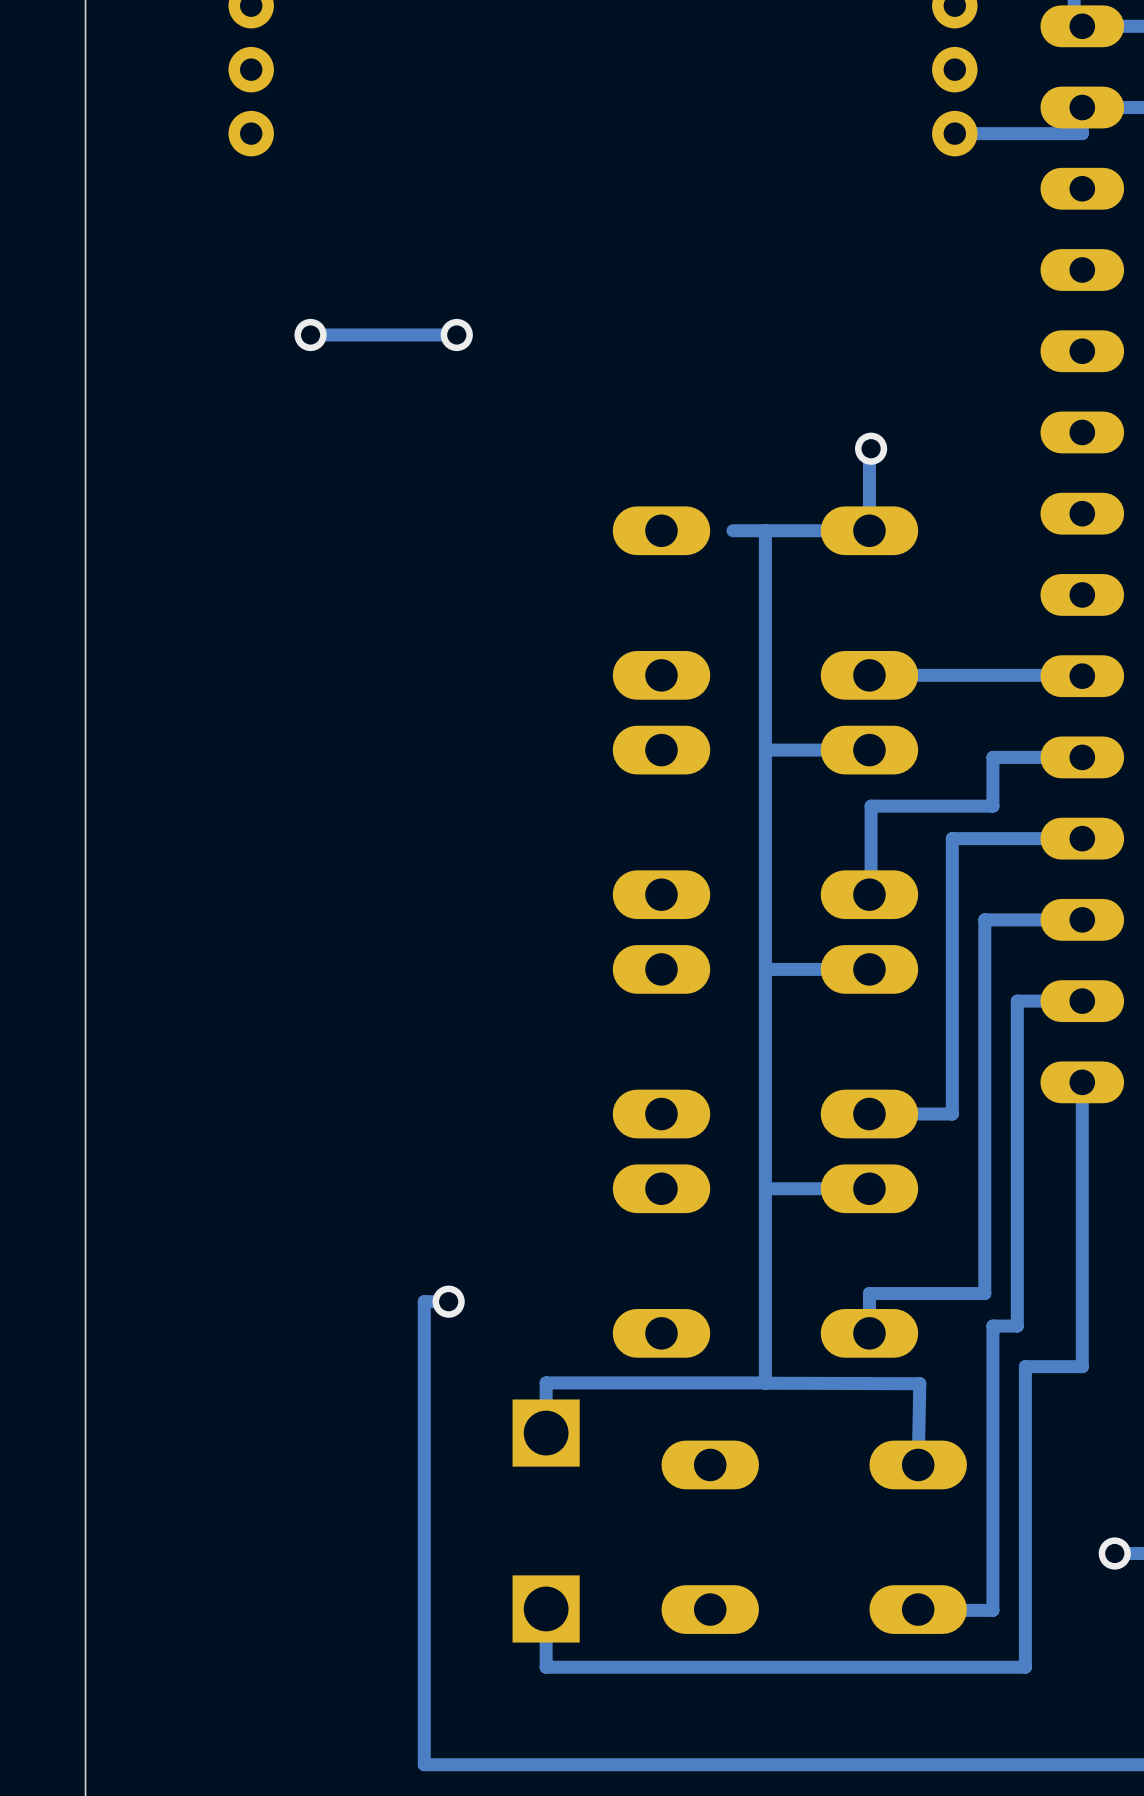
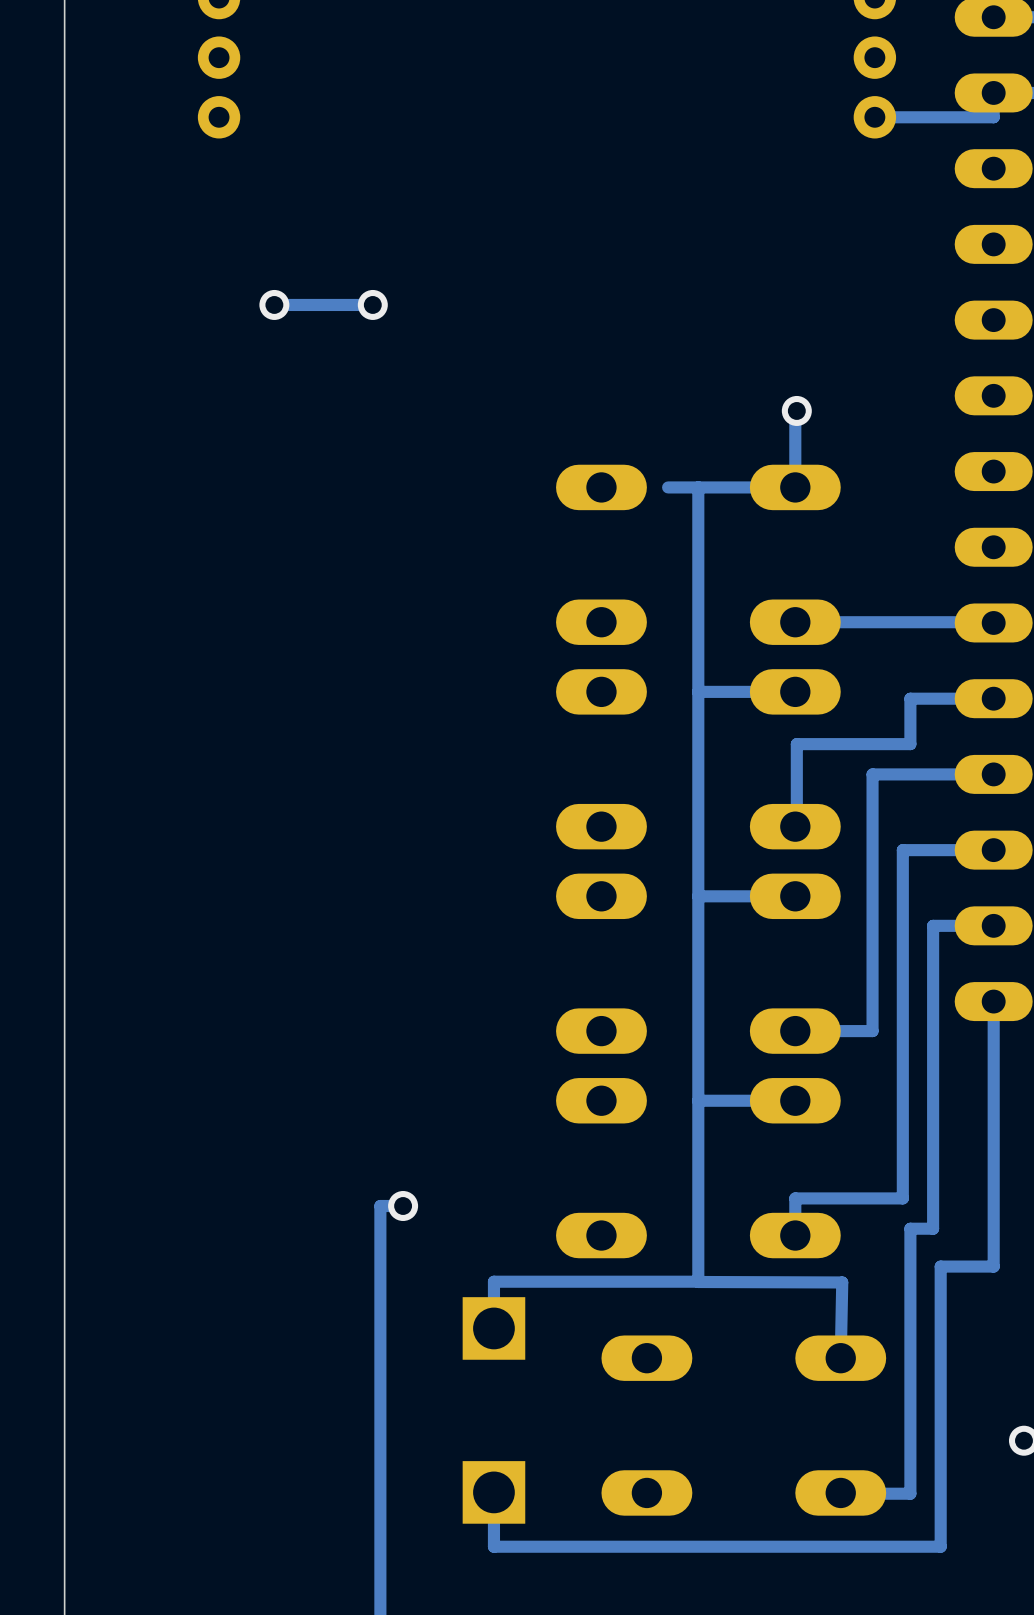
track: (456, 334) (416, 334) -> none
via position: (456, 334) -> (372, 304)

